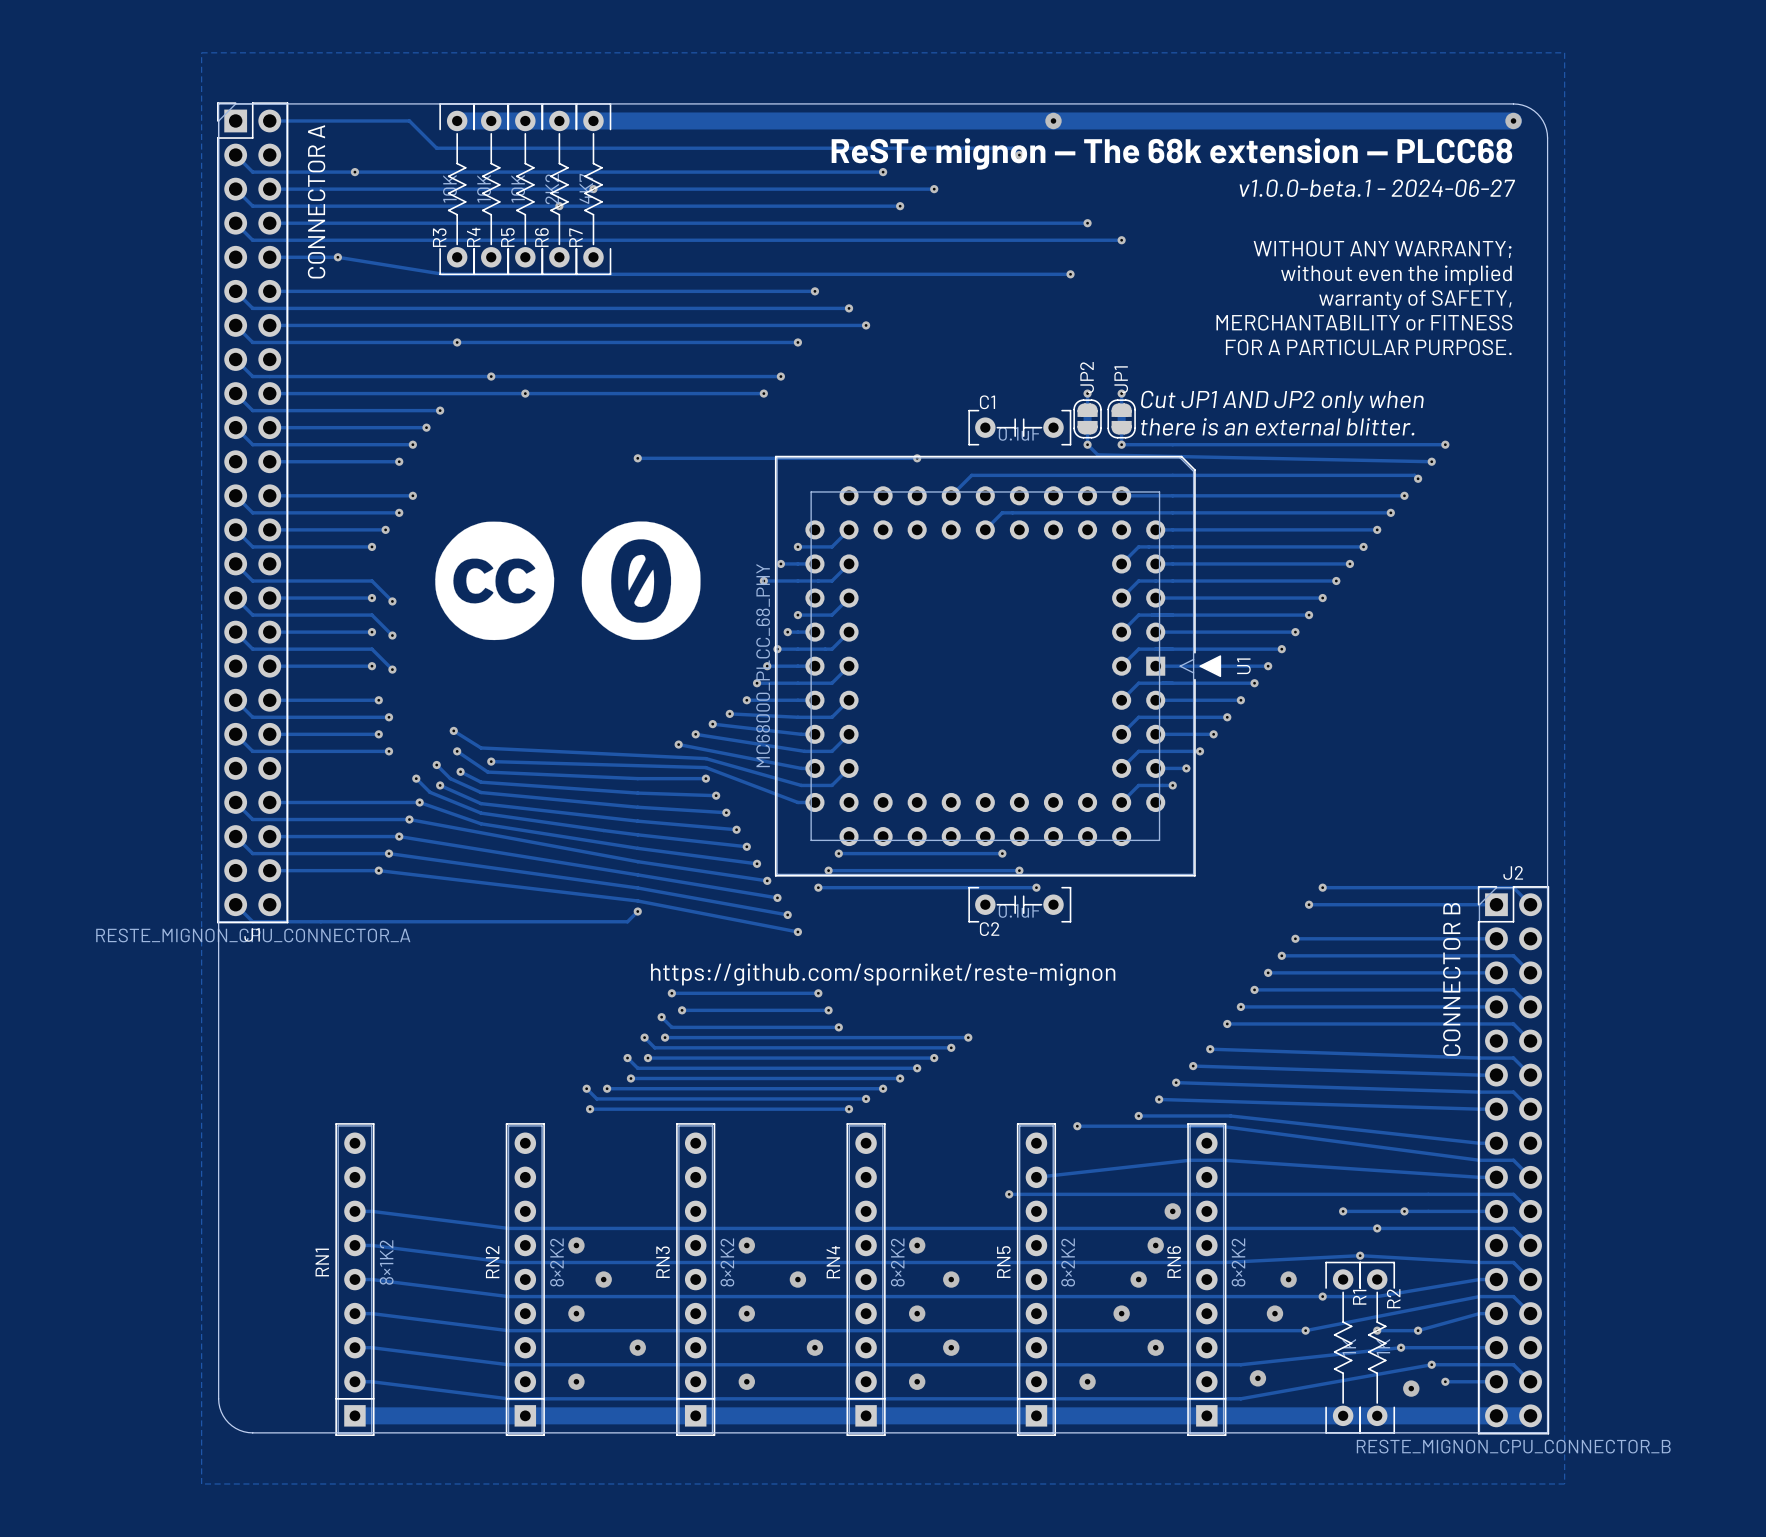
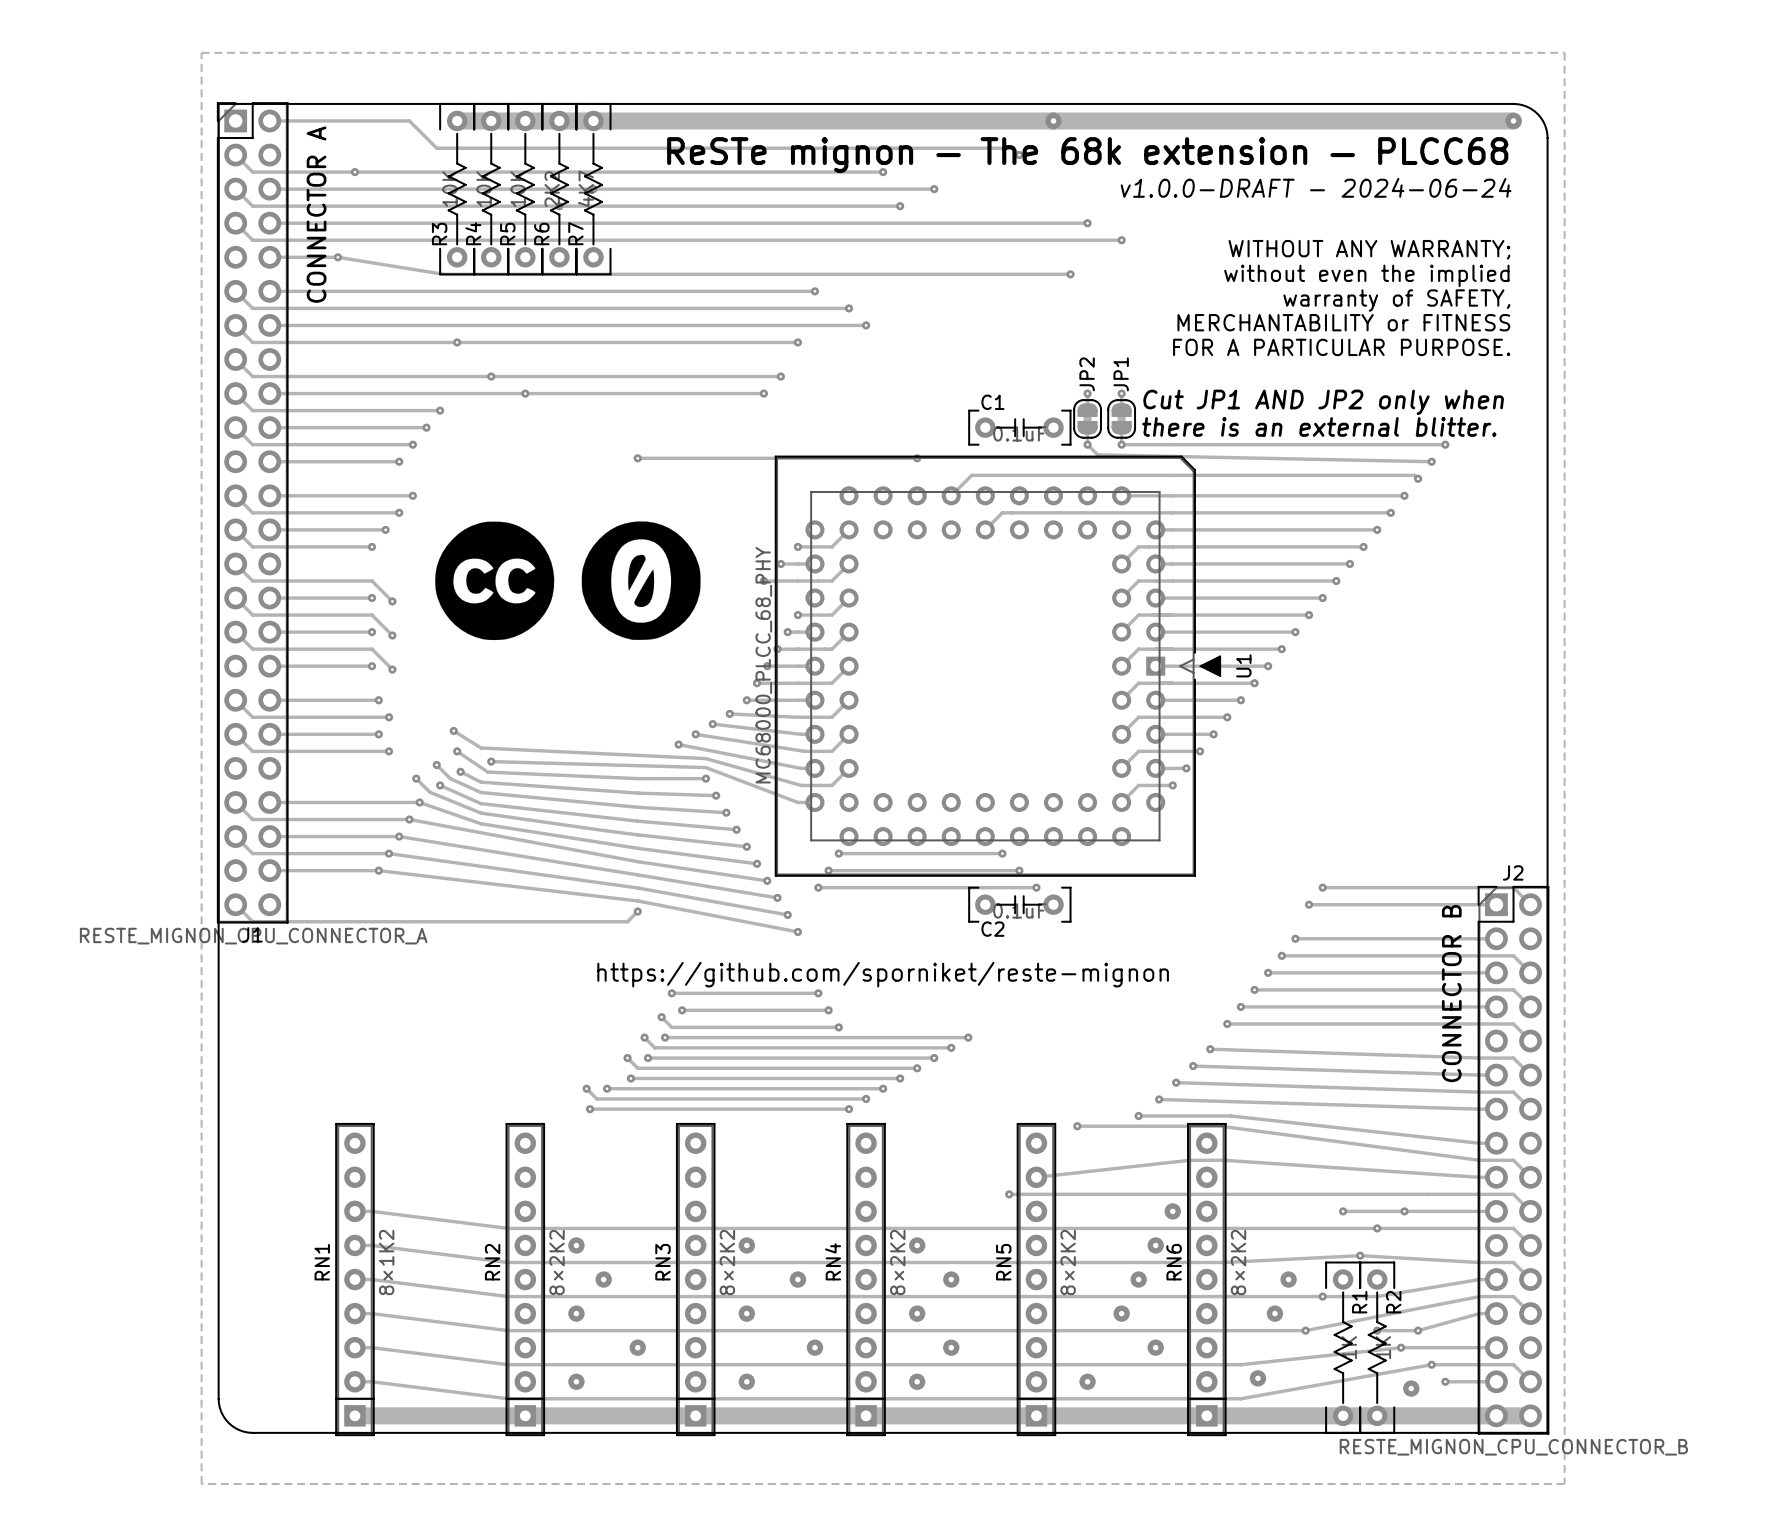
text: v1.0.0-beta.1 - 2024-06-27 (1377, 188) -> v1.0.0-DRAFT - 2024-06-24 (1316, 187)

